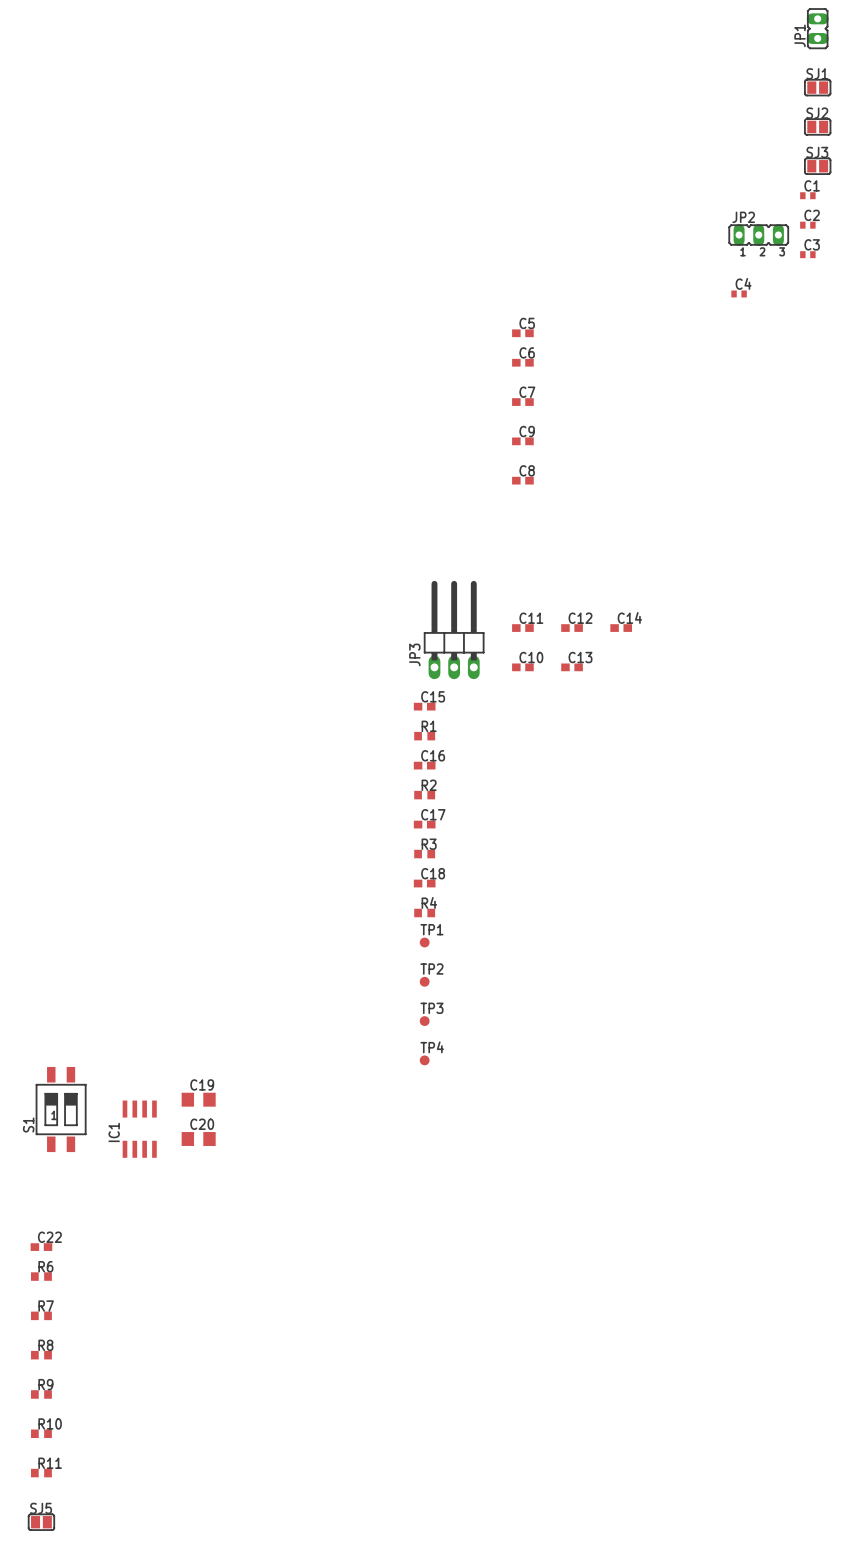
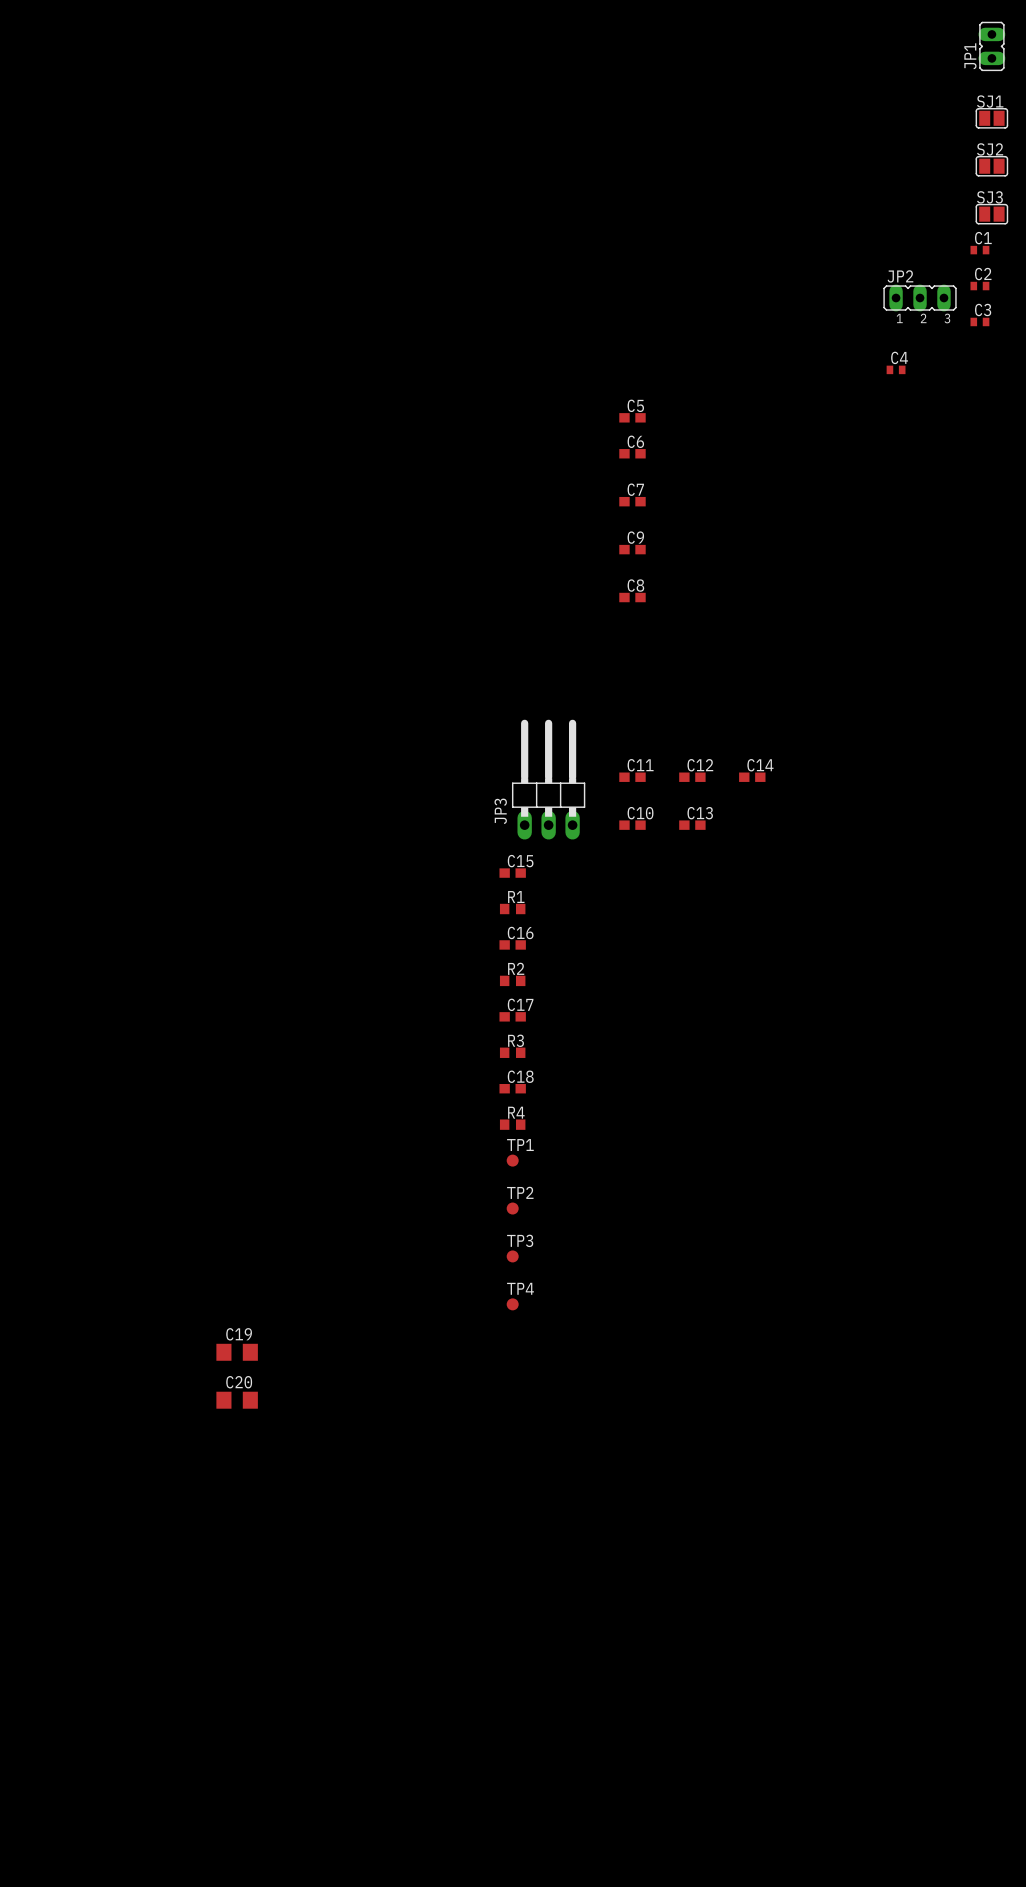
S1: (61, 1109) -> none
IC1: (139, 1129) -> none
C22: (41, 1247) -> none
R6: (41, 1276) -> none
R7: (41, 1315) -> none
R8: (41, 1355) -> none
R9: (41, 1394) -> none
R10: (41, 1433) -> none
R11: (41, 1473) -> none
SJ5: (41, 1522) -> none

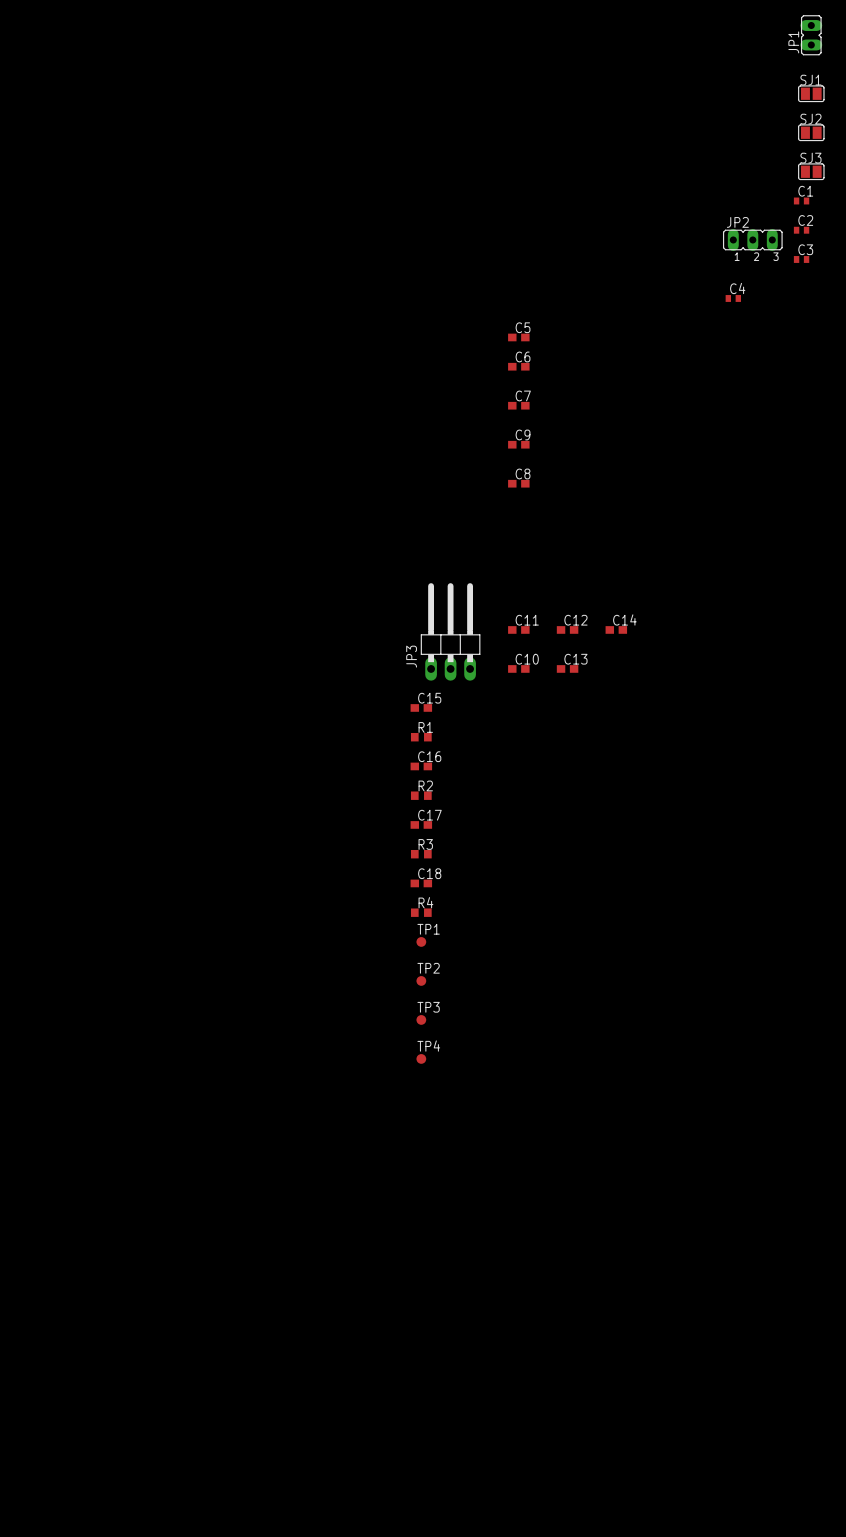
C19: (237, 1352) -> none
C20: (237, 1400) -> none

